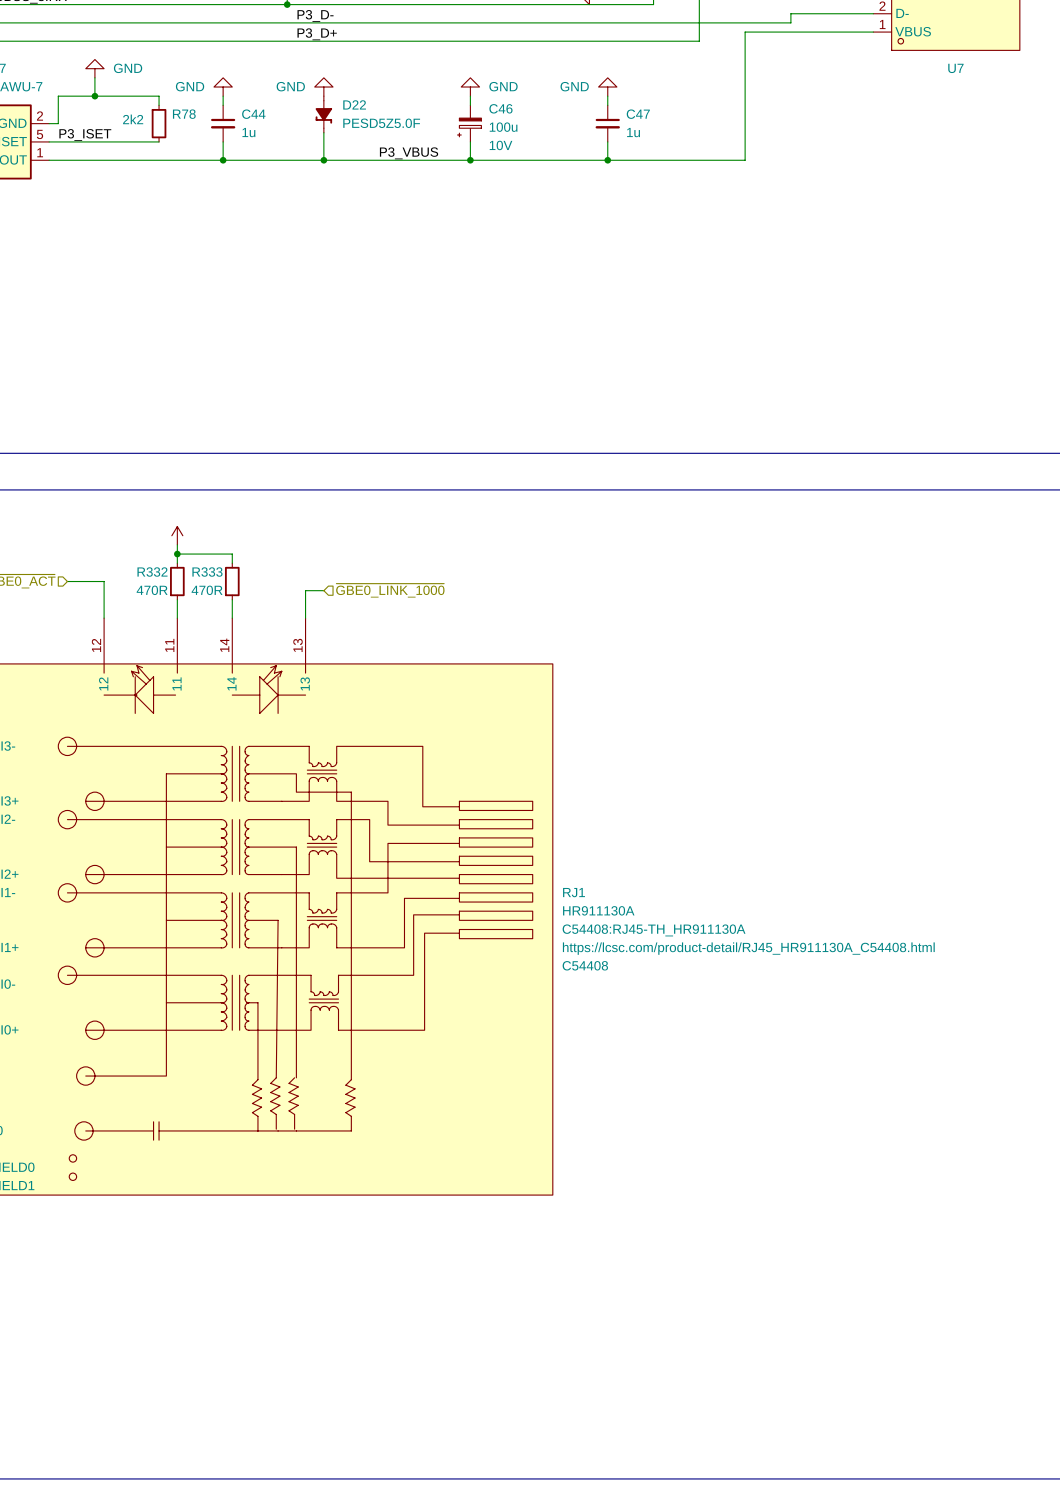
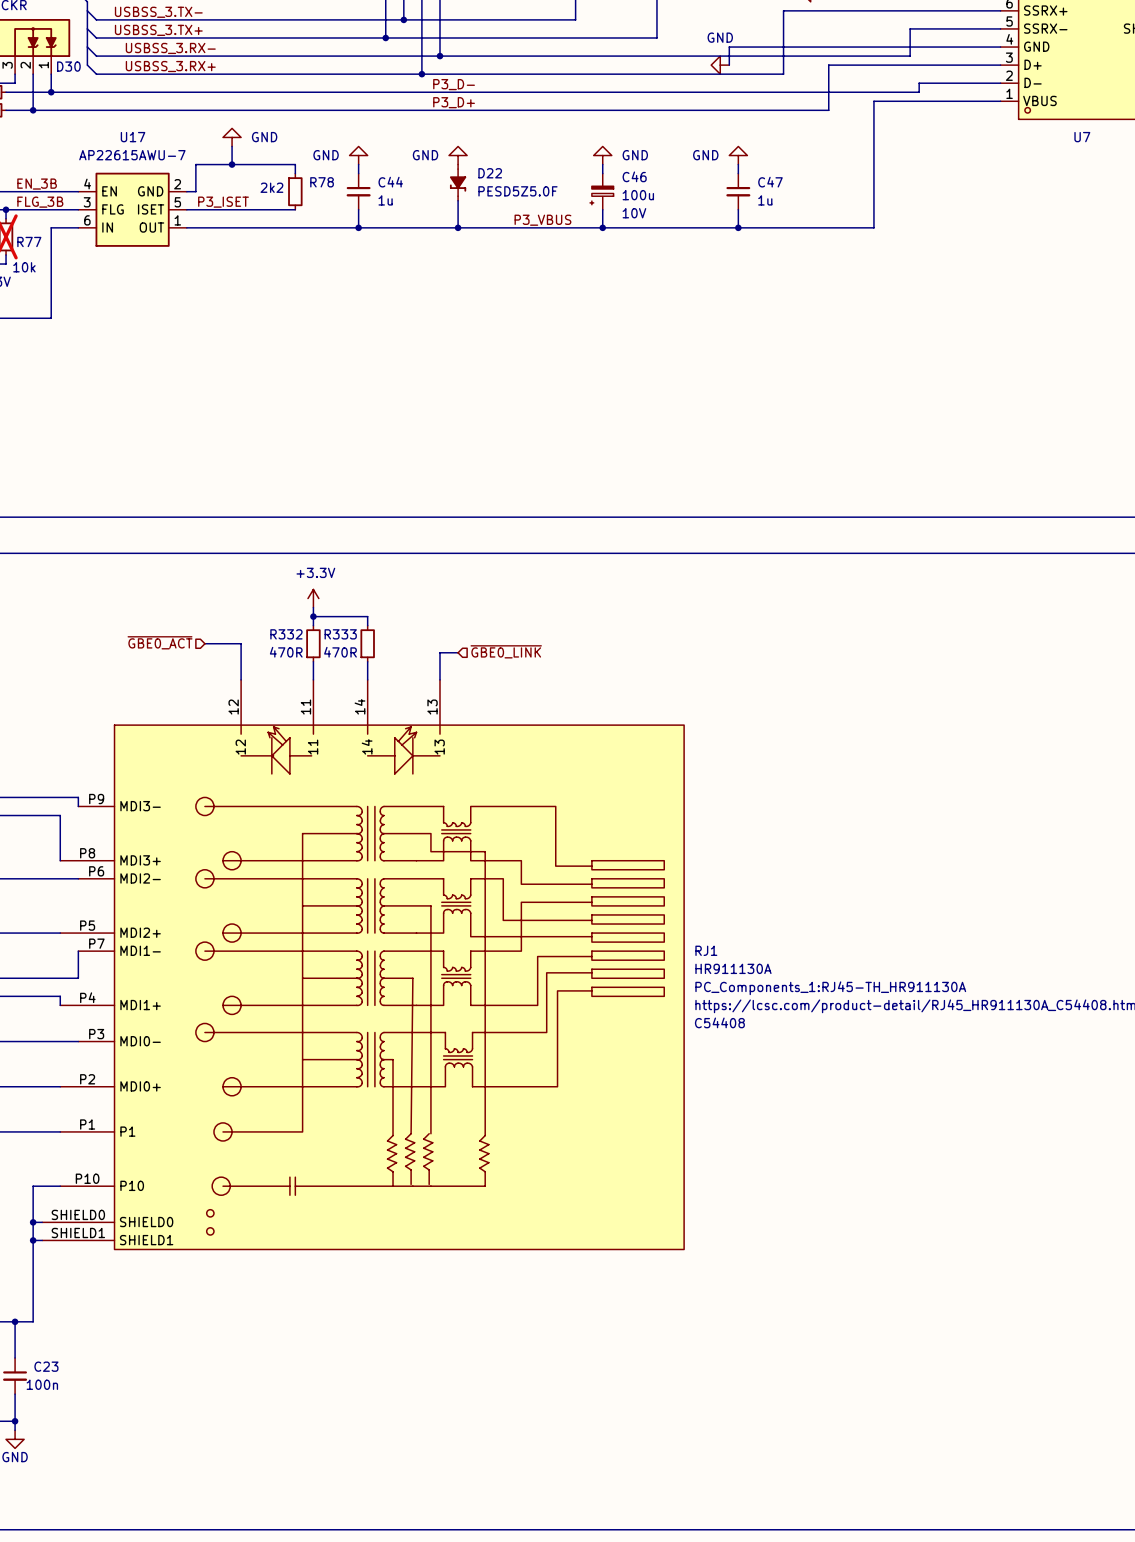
power symbol text: none -> +3.3V (315, 572)
hierarchical label: ~{GBE0_LINK_1000} (390, 590) -> ~{GBE0_LINK} (506, 651)
RJ1 text: C54408:RJ45-TH_HR911130A (654, 930) -> PC_Components_1:RJ45-TH_HR911130A (830, 988)

